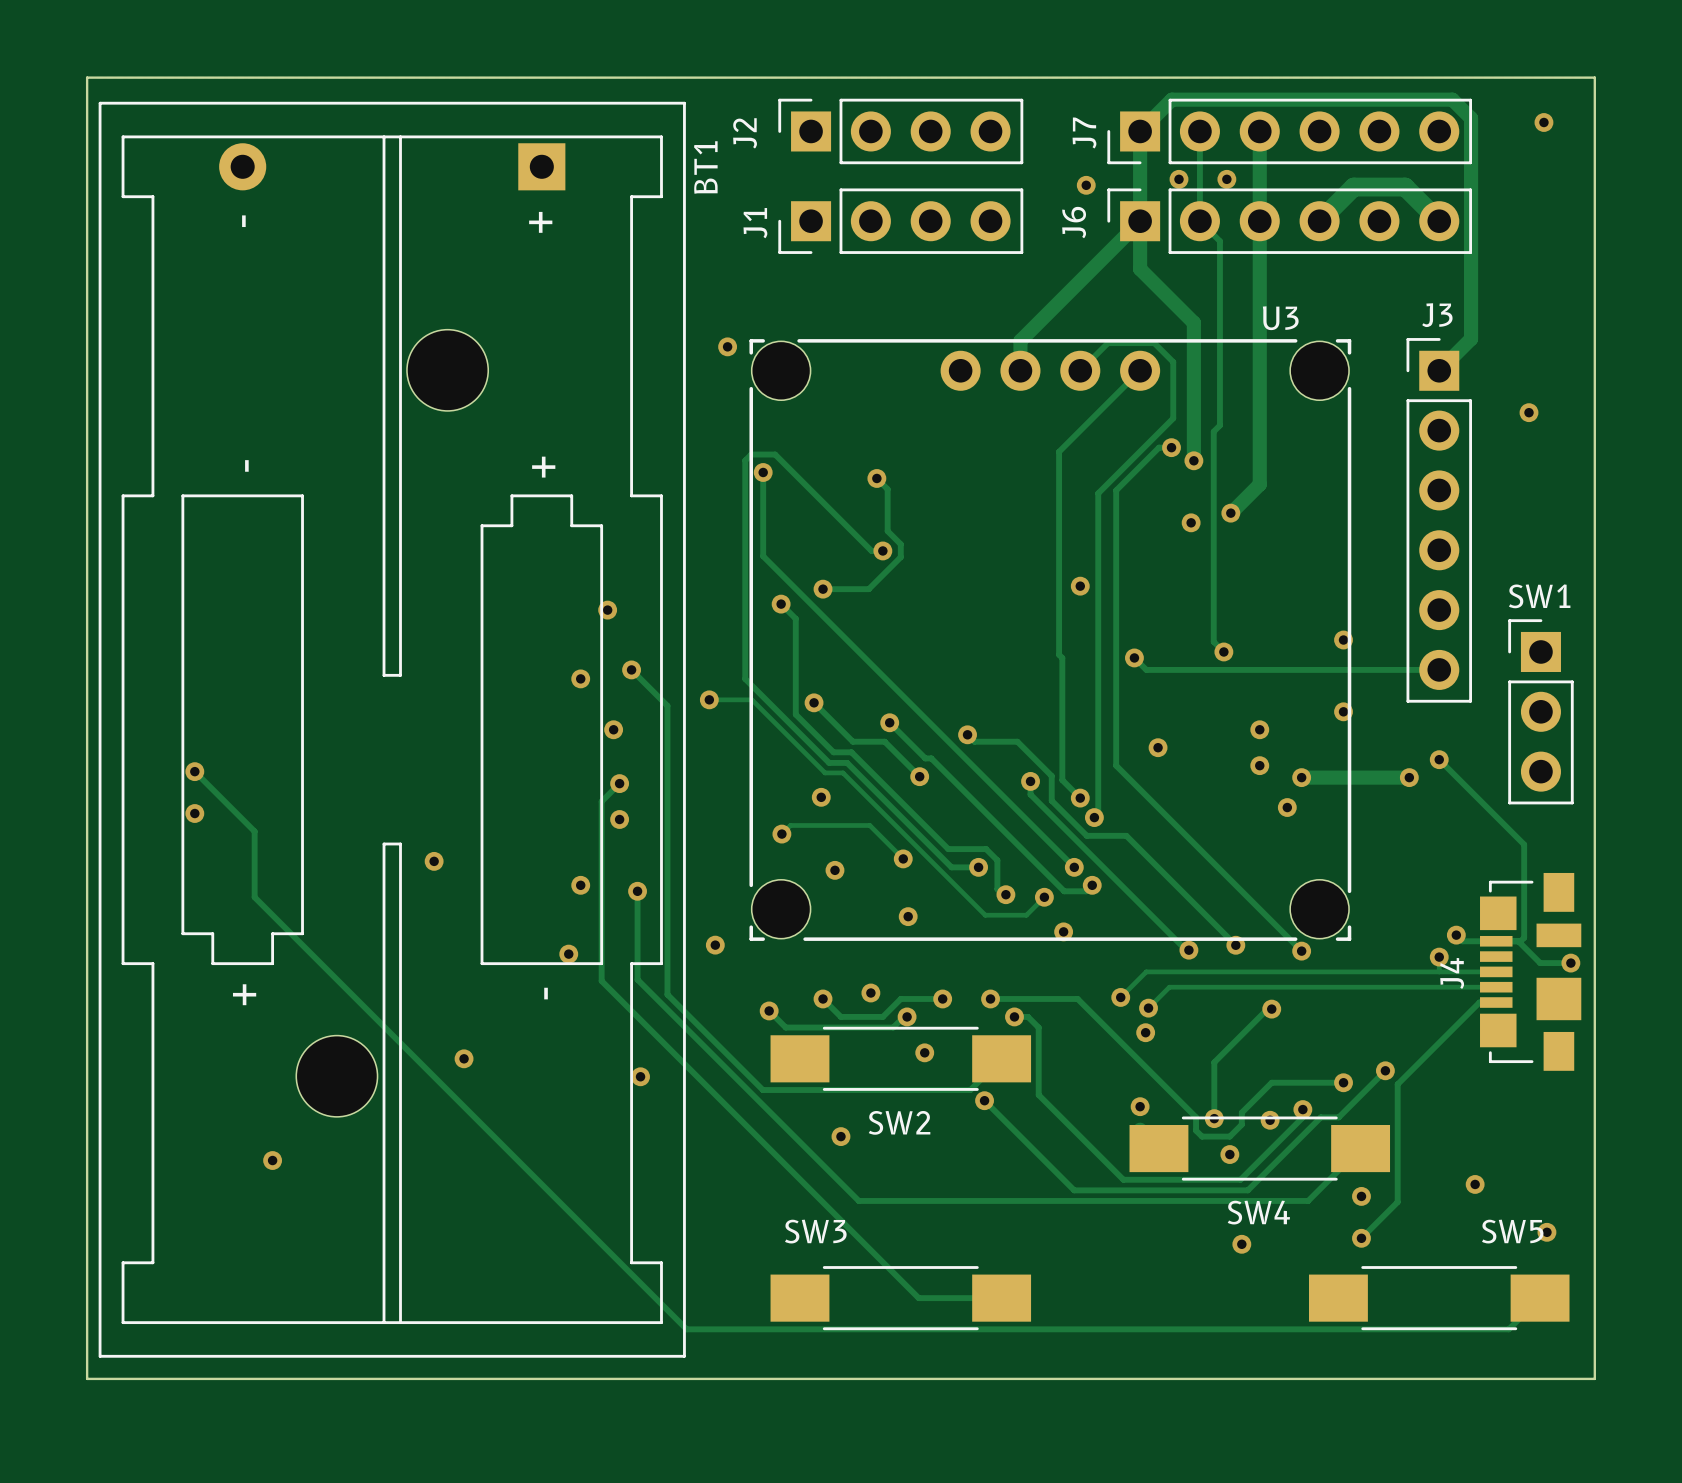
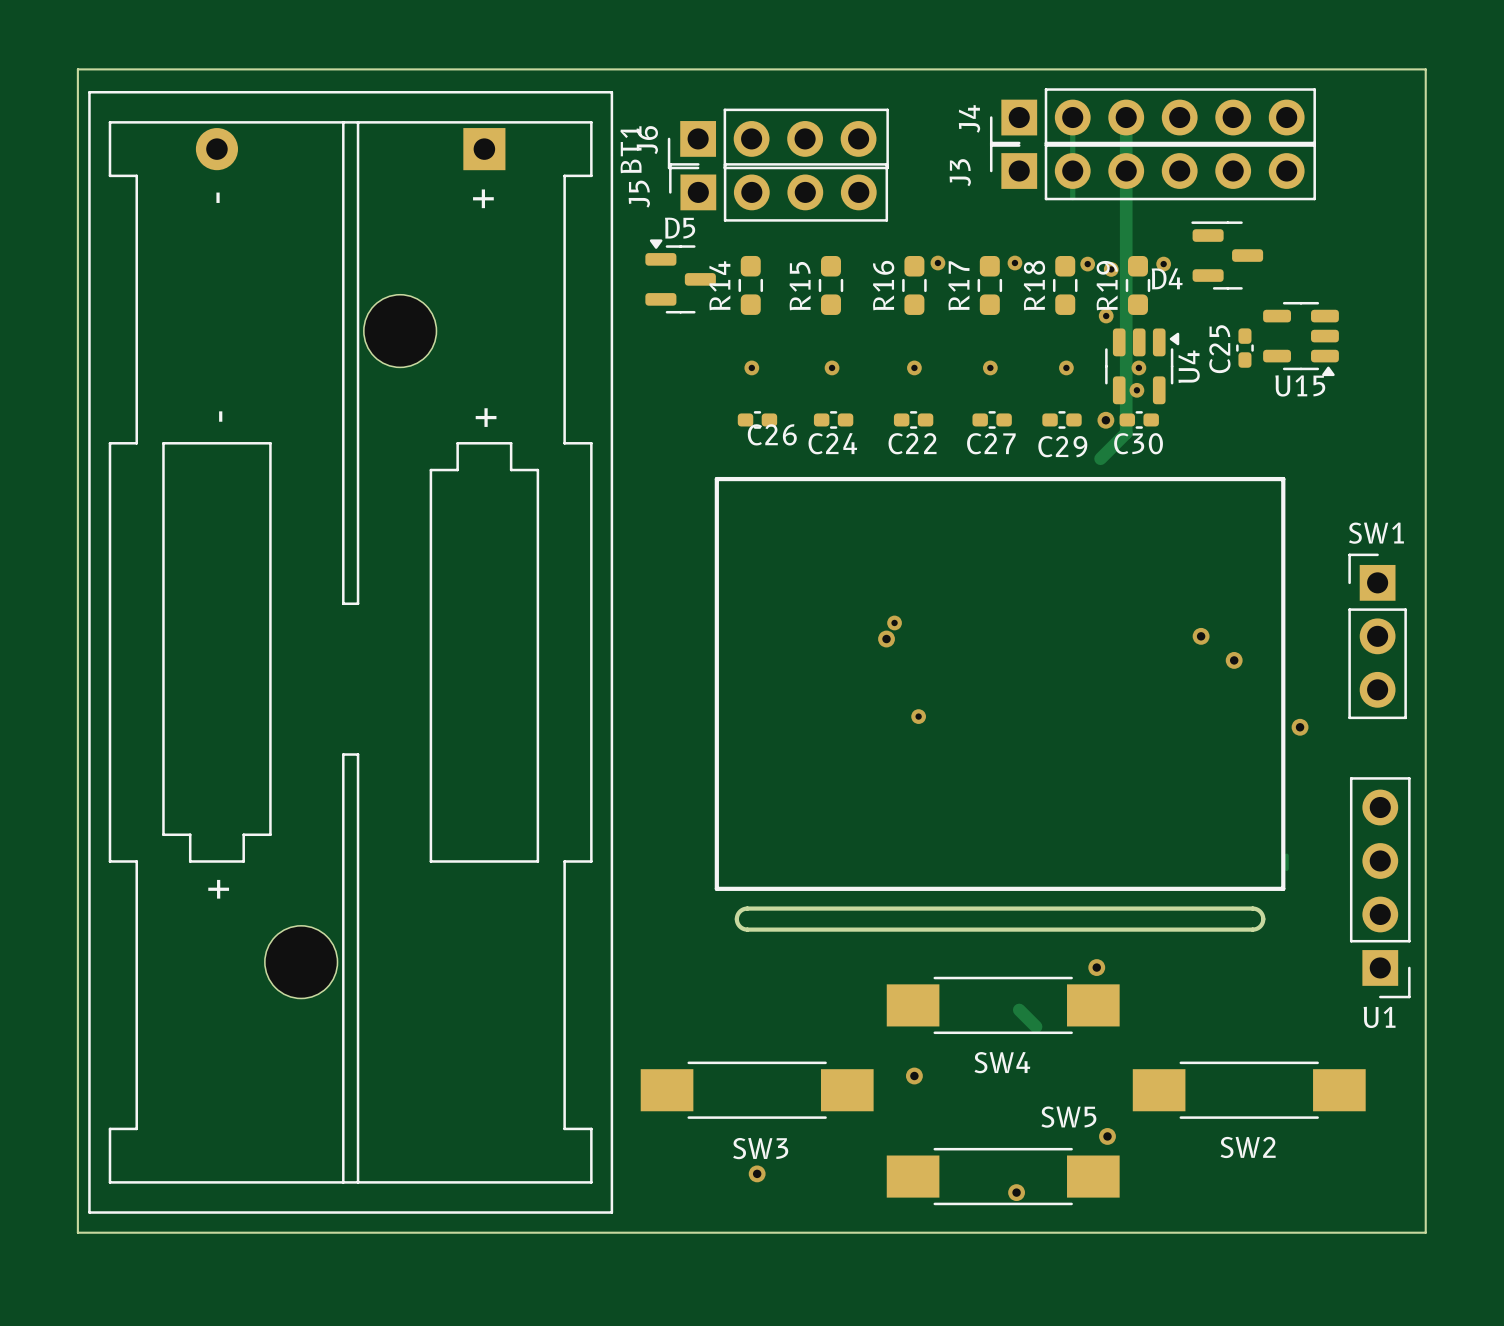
via: (1543, 122) -> none
J2: (900, 131) -> none
J7 name: J7 (1084, 133) -> J4 (969, 118)
via: (1179, 179) -> none
via: (1226, 179) -> none
via: (1086, 185) -> none
J6 footprint: [1107, 188, 1473, 254] -> [667, 108, 889, 170]
J5: none -> (778, 192)
J1: (900, 221) -> none
track: (1140, 221) (1020, 340) (1020, 370) -> none
track: (1199, 221) (1219, 241) (1219, 425) (1213, 431) (1213, 641) (1223, 651) -> none
track: (1319, 221) (1353, 187) (1405, 187) (1439, 221) -> none
J6 name position: J6 (1074, 222) -> J6 (647, 140)
D4: none -> (1227, 255)
via: none -> (937, 263)
via: none -> (1014, 263)
via: none -> (1087, 264)
via: none -> (1163, 264)
via: none -> (1111, 269)
D5: none -> (680, 276)
J3 name position: J3 (1437, 315) -> J3 (960, 172)
R14: none -> (750, 285)
R15: none -> (830, 285)
R16: none -> (914, 285)
R17: none -> (989, 285)
R18: none -> (1065, 285)
R19: none -> (1137, 285)
J3 footprint: [1406, 338, 1473, 703] -> [989, 141, 1316, 201]
via: (727, 346) -> none
via: none -> (1106, 316)
track: (1080, 370) (1107, 343) (1154, 343) (1173, 362) (1173, 418) (1098, 493) (1098, 813) (1094, 817) -> none
track: (1140, 370) (1059, 451) (1059, 654) (1062, 658) (1062, 780) (1080, 798) -> none
track: (1439, 370) (1471, 338) (1471, 118) (1452, 99) (1171, 99) (1140, 131) (1140, 269) (1193, 322) (1193, 460) -> none
U15: none -> (1301, 339)
C25: none -> (1244, 348)
U4: none -> (1142, 366)
via: none -> (751, 367)
via: none -> (832, 367)
via: none -> (914, 367)
via: none -> (990, 367)
via: none -> (1066, 367)
via: none -> (1138, 367)
via: (1529, 412) -> none
via: none -> (1136, 390)
track: (1171, 447) (1158, 447) (1116, 490) (1116, 765) (1301, 951) -> none
via: (1171, 447) -> none
via: (1193, 460) -> none
C26: none -> (757, 419)
C24: none -> (833, 419)
C22: none -> (913, 419)
C27: none -> (992, 419)
C29: none -> (1062, 419)
C30: none -> (1139, 419)
via: none -> (1105, 420)
track: (763, 472) (763, 556) (1074, 867) -> none
via: (763, 472) -> none
track: (876, 478) (887, 489) (887, 531) (900, 544) (900, 557) (868, 589) (823, 589) -> none
via: (876, 478) -> none
via: (1230, 513) -> none
via: (1191, 522) -> none
line: none -> (716, 479) (1283, 479) (1283, 888) (716, 888) (716, 479)
track: (882, 550) (871, 550) (775, 454) (751, 454) (745, 460) (745, 678) (829, 762) (847, 762) (951, 867) (978, 867) -> none
via: (882, 550) -> none
via: (1080, 586) -> none
via: (823, 589) -> none
track: (781, 604) (795, 618) (795, 714) (833, 752) (851, 752) (948, 849) (986, 849) (997, 860) (997, 889) (1002, 894) (1005, 894) -> none
via: (781, 604) -> none
via: (607, 610) -> none
U3: (1050, 640) -> none
via: (1343, 640) -> none
via: (1223, 651) -> none
track: (1134, 657) (1146, 669) (1439, 669) -> none
via: (1134, 657) -> none
track: (631, 669) (667, 705) (667, 994) (762, 1090) (970, 1090) (1001, 1058) -> none
via: (631, 669) -> none
via: (580, 678) -> none
via: none -> (894, 622)
track: (709, 699) (751, 699) (825, 772) (843, 772) (985, 915) (1026, 915) (1044, 897) -> none
via: (709, 699) -> none
track: (814, 702) (852, 741) (884, 741) (919, 776) -> none
via: (814, 702) -> none
track: (889, 722) (925, 758) (931, 758) (1064, 891) (1086, 891) (1092, 885) -> none
via: (889, 722) -> none
via: (613, 729) -> none
via: (1259, 729) -> none
track: (967, 734) (974, 741) (1017, 741) (1051, 776) (1051, 800) (1086, 835) (1126, 835) (1235, 945) -> none
via position: (967, 734) -> (886, 639)
via: none -> (1234, 660)
via: (1158, 747) -> none
track: (1439, 759) (1524, 844) (1524, 937) (1520, 941) (1462, 941) (1456, 935) -> none
via: (1439, 759) -> none
via: (1259, 765) -> none
track: (194, 771) (254, 831) (254, 897) (686, 1329) (1508, 1329) (1540, 1298) -> none
via: (194, 771) -> none
via: (919, 776) -> none
track: (1301, 777) (1409, 777) -> none
via: (1301, 777) -> none
via: (1409, 777) -> none
track: (1030, 781) (1030, 794) (1186, 950) (1188, 950) -> none
via: (1030, 781) -> none
track: (619, 783) (601, 801) (601, 981) (918, 1298) (1001, 1298) -> none
via: (619, 783) -> none
via: (821, 797) -> none
via: (1080, 798) -> none
via: none -> (918, 716)
via: (1287, 807) -> none
via: (194, 813) -> none
via: none -> (1300, 727)
via: (1094, 817) -> none
via: (619, 819) -> none
track: (781, 834) (790, 825) (869, 825) (903, 858) -> none
via: (781, 834) -> none
via: (903, 858) -> none
via: (434, 861) -> none
via: (978, 867) -> none
via: (1074, 867) -> none
via: (834, 870) -> none
via: (580, 885) -> none
via: (1092, 885) -> none
track: (637, 891) (637, 979) (858, 1200) (1308, 1200) (1360, 1148) -> none
via: (637, 891) -> none
via: (1005, 894) -> none
via: (1044, 897) -> none
via: (908, 916) -> none
via: (1063, 931) -> none
via: (1456, 935) -> none
track: (1518, 941) (1540, 963) (1570, 963) -> none
via: (715, 945) -> none
via: (1235, 945) -> none
via: (1188, 950) -> none
via: (1301, 951) -> none
via: (568, 954) -> none
via: (1439, 957) -> none
via: (1570, 963) -> none
track: (1496, 971) (1146, 971) (1120, 997) -> none
J4: (1530, 971) -> none
track: (1496, 987) (1169, 987) (1148, 1008) -> none
BT1 text: - (546, 993) -> none
via: (870, 993) -> none
U1: none -> (1380, 887)
via: (1120, 997) -> none
track: (823, 998) (840, 1016) (882, 1016) (900, 998) (942, 998) -> none
via: (823, 998) -> none
via: (942, 998) -> none
track: (990, 998) (1077, 998) (1196, 1117) (1196, 1130) (1202, 1136) (1229, 1136) (1241, 1124) (1241, 1112) (1271, 1082) (1343, 1082) -> none
via: (990, 998) -> none
track: (1496, 1002) (1479, 1002) (1397, 1084) (1397, 1202) (1361, 1238) -> none
via: (1148, 1008) -> none
track: (1271, 1009) (1267, 1009) (1214, 1062) (1214, 1118) -> none
via: (1271, 1009) -> none
track: (769, 1010) (785, 1027) (893, 1027) (903, 1016) (907, 1016) -> none
via: (769, 1010) -> none
board edge: none -> (747, 908) (1252, 908) (1260, 911) (1263, 919) (1260, 926) (1252, 929) (747, 929) (739, 926) (736, 919) (739, 911) (747, 908)
via: (907, 1016) -> none
track: (1014, 1016) (1028, 1016) (1038, 1027) (1038, 1095) (1123, 1179) (1240, 1179) (1302, 1117) (1302, 1109) -> none
via: (1014, 1016) -> none
via: (1145, 1032) -> none
via: (924, 1052) -> none
via: (464, 1058) -> none
SW2 position: (900, 1058) -> (1249, 1090)
track: (1385, 1070) (1338, 1117) (1320, 1117) (1247, 1190) (1074, 1190) (984, 1100) -> none
via: (1385, 1070) -> none
via: (640, 1076) -> none
via: none -> (1096, 967)
via: (1343, 1082) -> none
via: (984, 1100) -> none
via: (1140, 1106) -> none
via: (1302, 1109) -> none
via: (1214, 1118) -> none
via: (1270, 1120) -> none
via: (840, 1136) -> none
SW4 position: (1259, 1148) -> (1003, 1005)
via: (1229, 1154) -> none
via: (272, 1160) -> none
via: (1475, 1184) -> none
via: (1361, 1196) -> none
via: none -> (914, 1076)
SW3 name position: SW3 (815, 1231) -> SW3 (760, 1148)
via: (1546, 1232) -> none
via: (1361, 1238) -> none
via position: (1241, 1244) -> (1107, 1136)
SW3 position: (900, 1298) -> (757, 1090)
SW5 position: (1439, 1298) -> (1003, 1176)
via: none -> (757, 1173)
via: none -> (1016, 1192)

